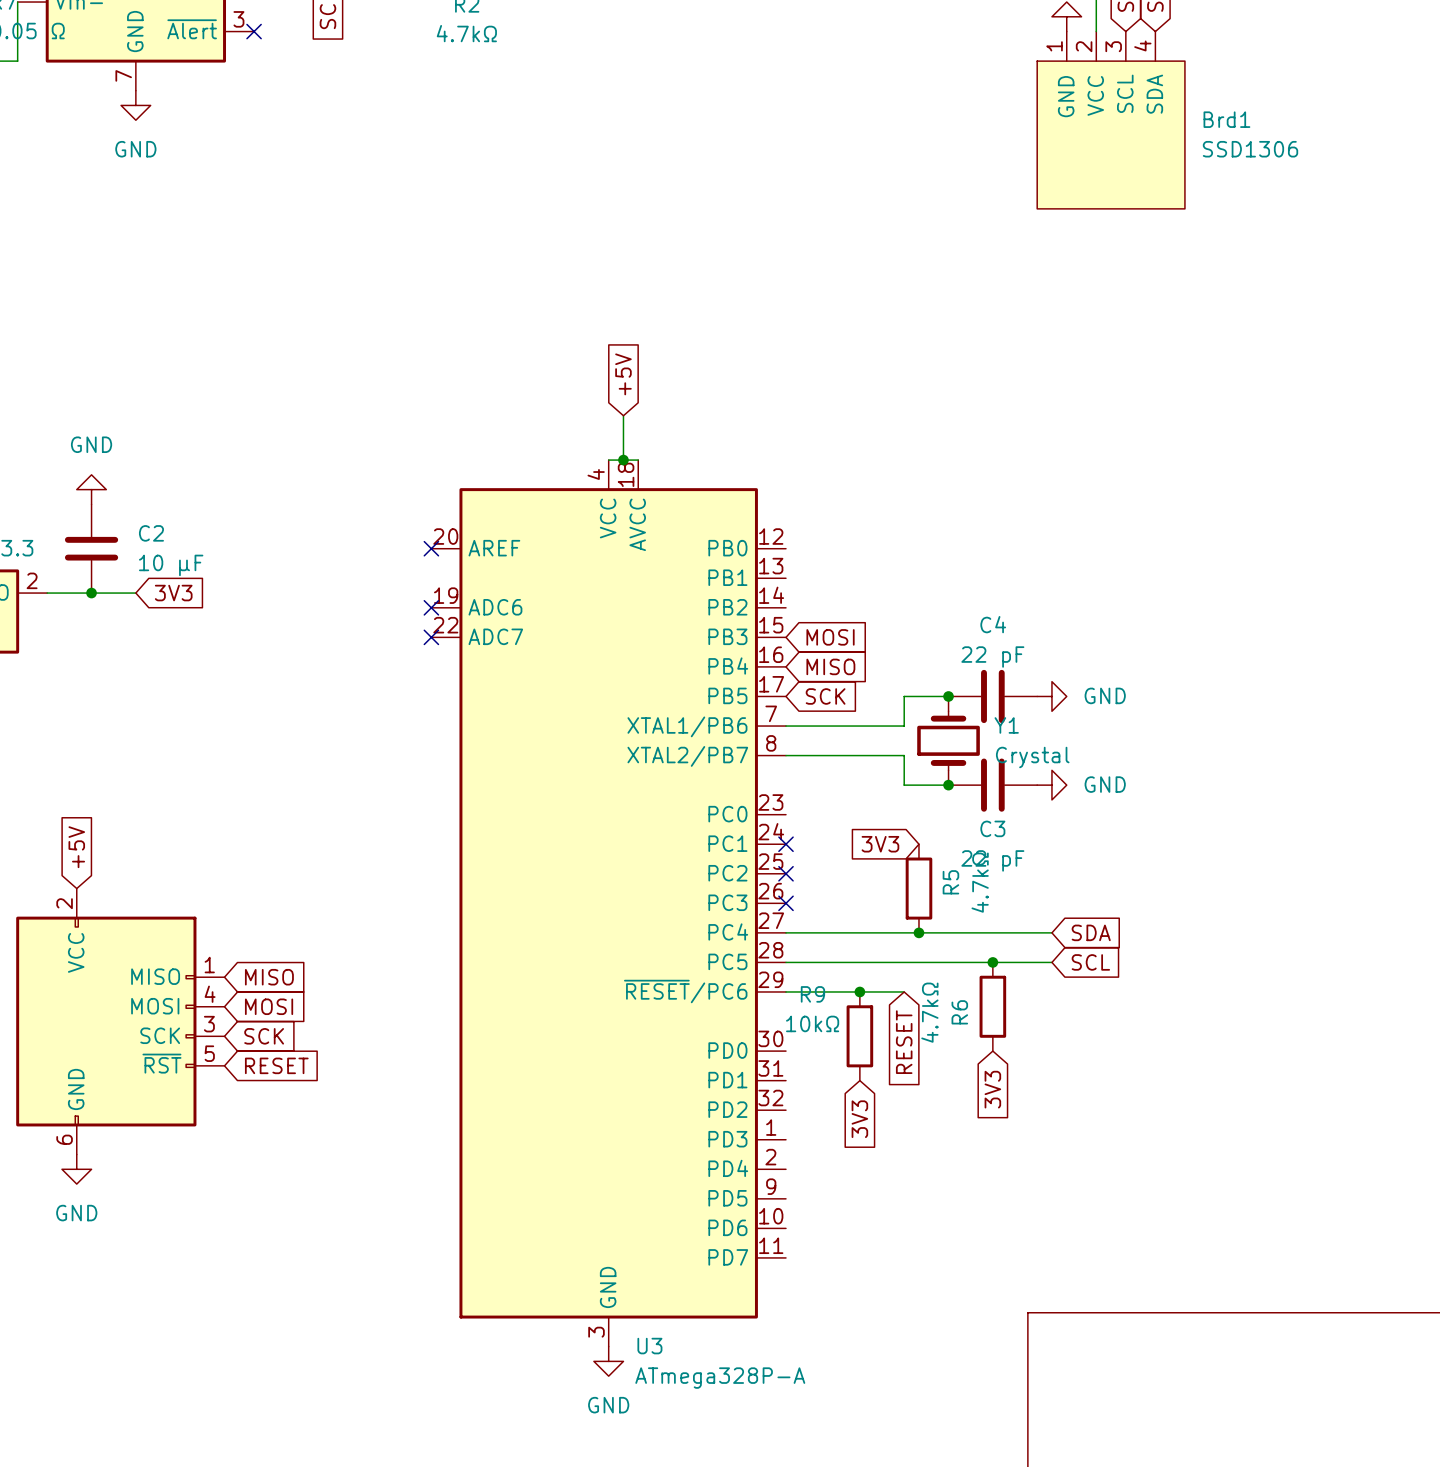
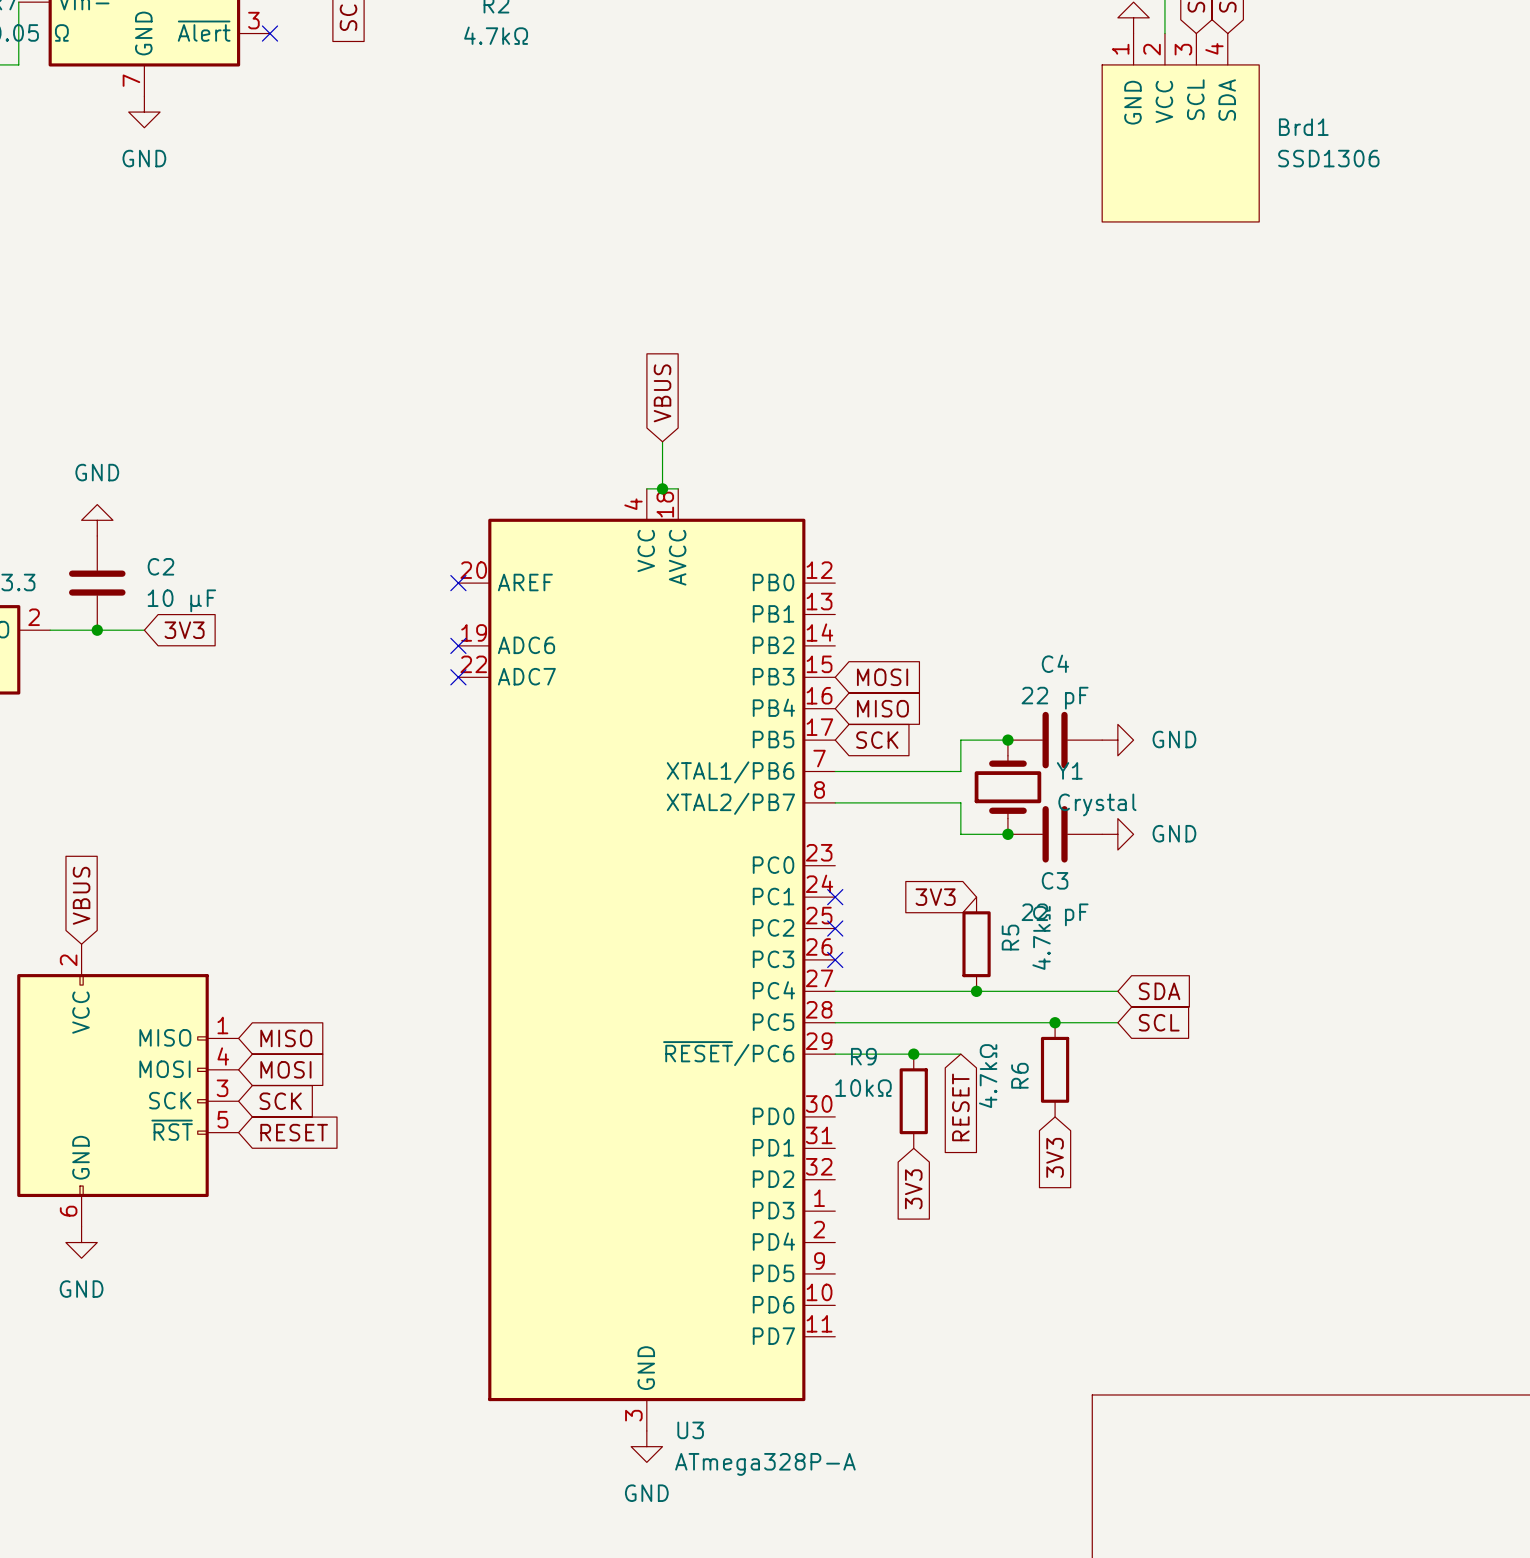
global label: +5V (623, 374) -> VBUS (662, 393)
global label: +5V (76, 847) -> VBUS (81, 895)

